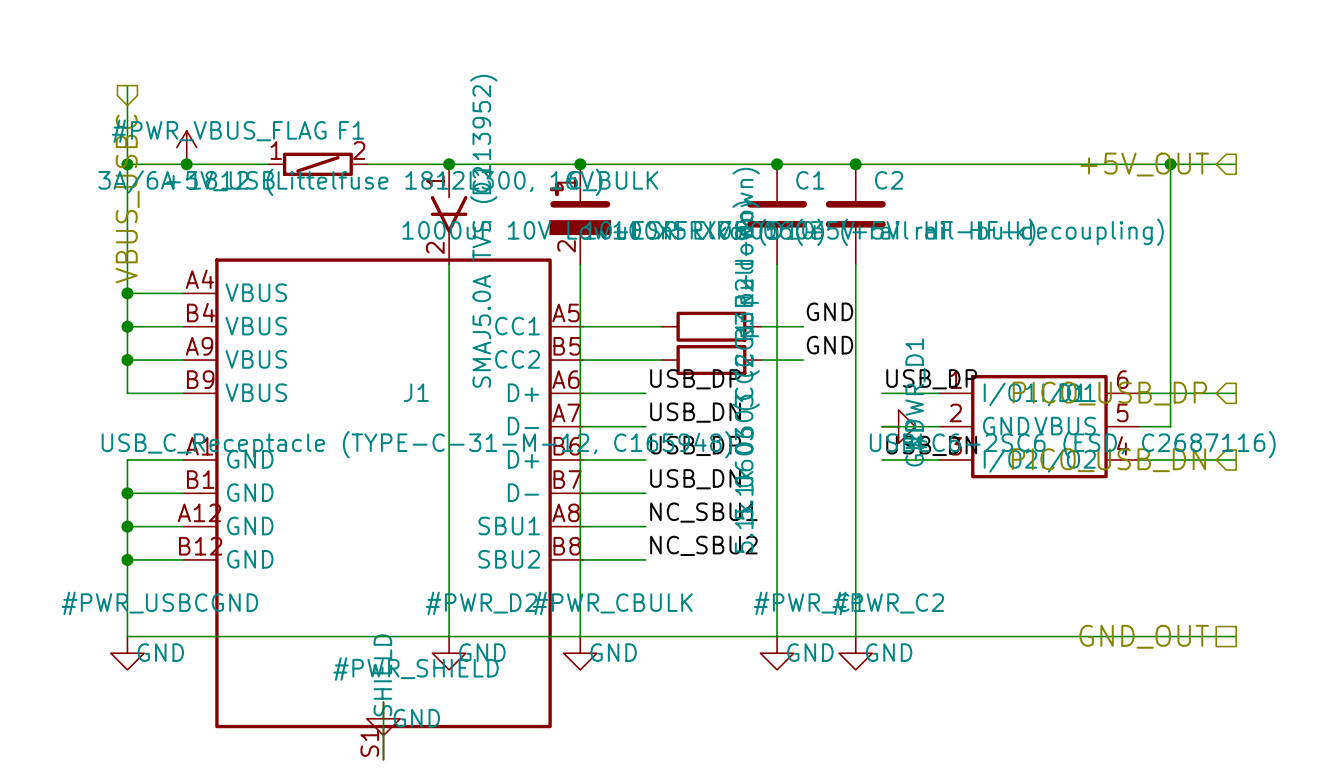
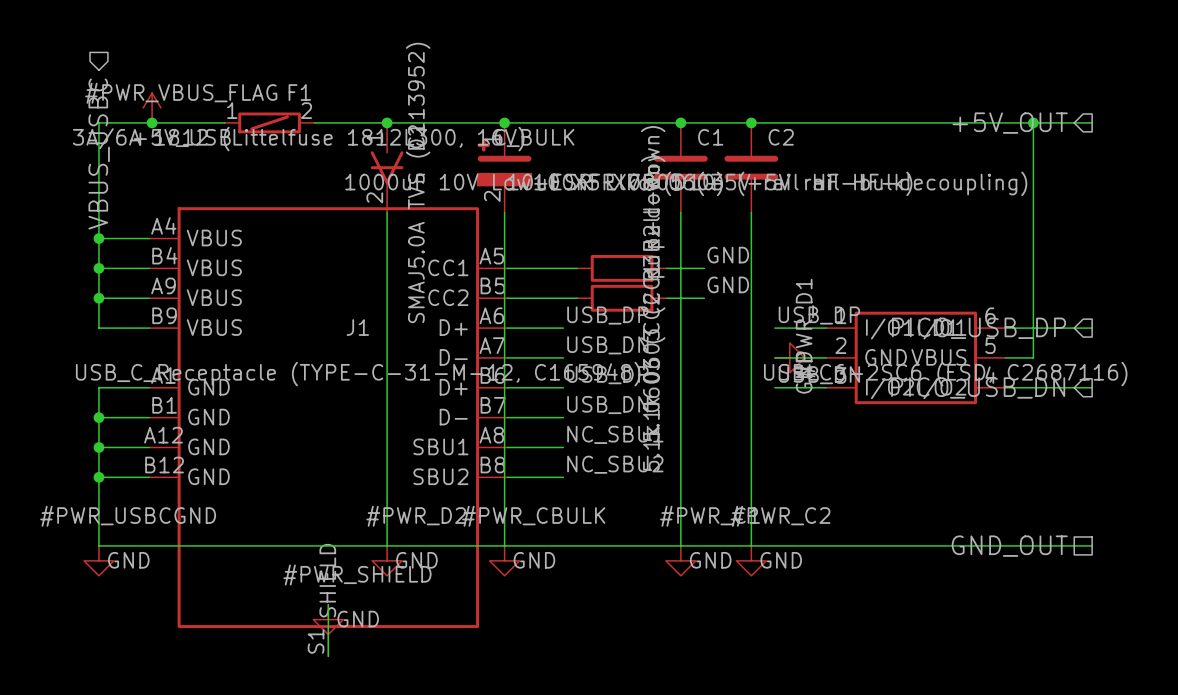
wire: (127, 85) (127, 164) -> none
junction: (127, 164) -> none

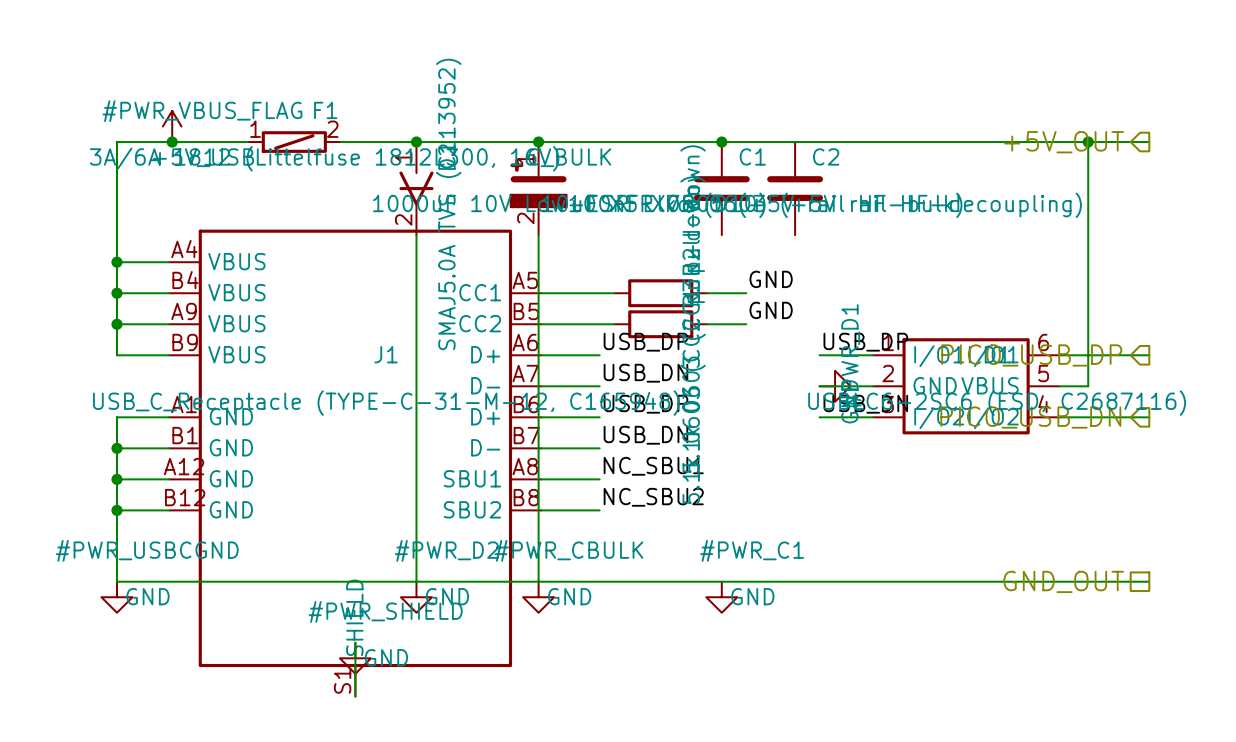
junction: (751, 122) -> none
hierarchical label: VBUS_USBC (99, 154) -> none
wire: (680, 212) (680, 545) -> none
wire: (751, 212) (751, 545) -> none
#PWR_C2: GND (751, 560) -> none

